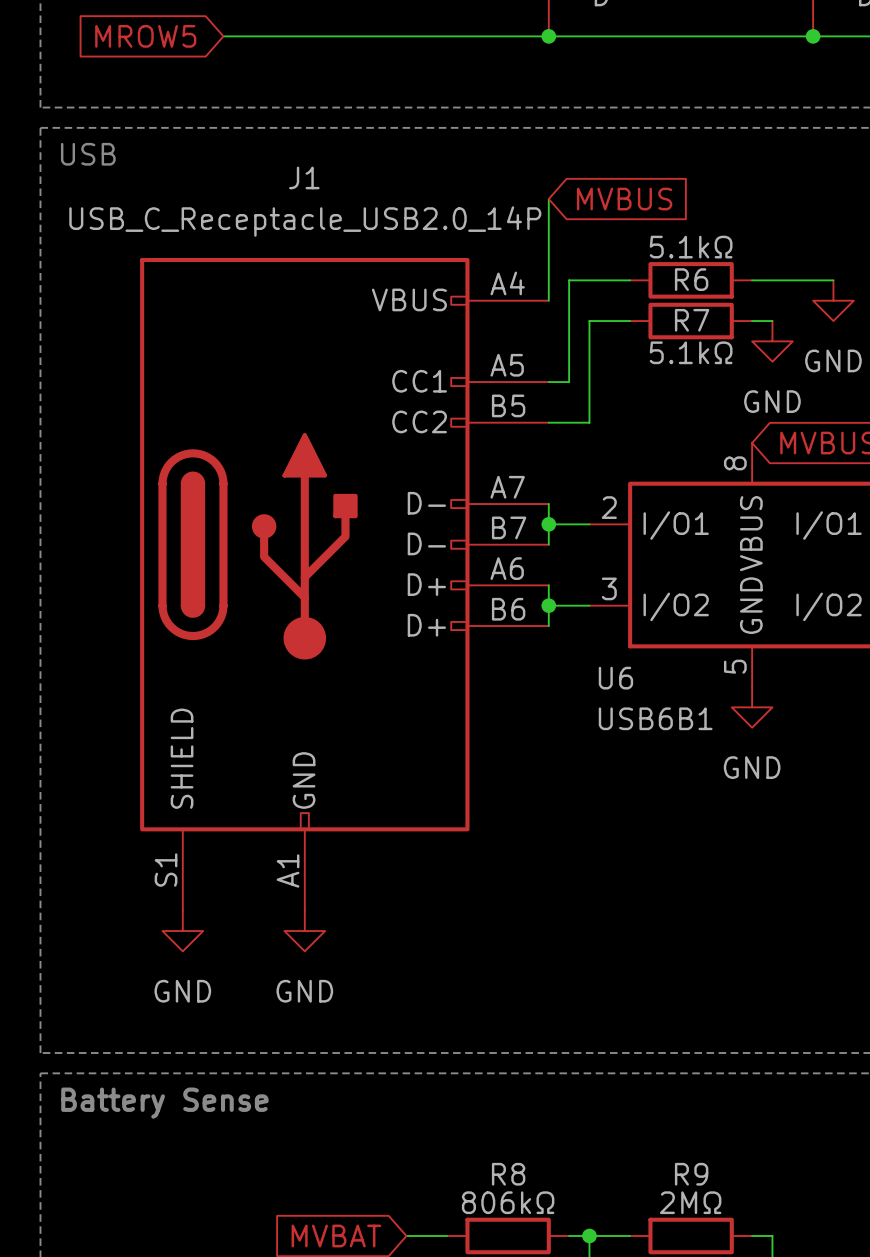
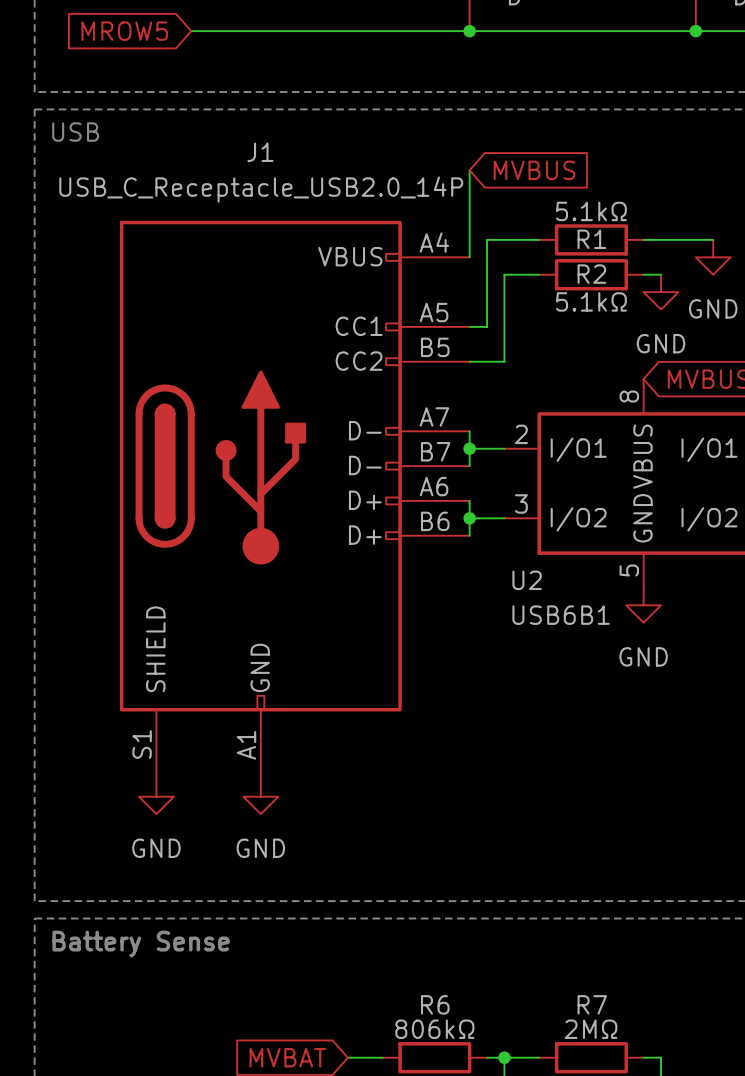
R6 name: R6 (691, 279) -> R1 (591, 239)
R7 name: R7 (692, 320) -> R2 (591, 274)
U6 name: U6 (615, 678) -> U2 (527, 580)
R8 name: R8 (508, 1174) -> R6 (435, 1004)
R9 name: R9 (691, 1174) -> R7 (592, 1004)

